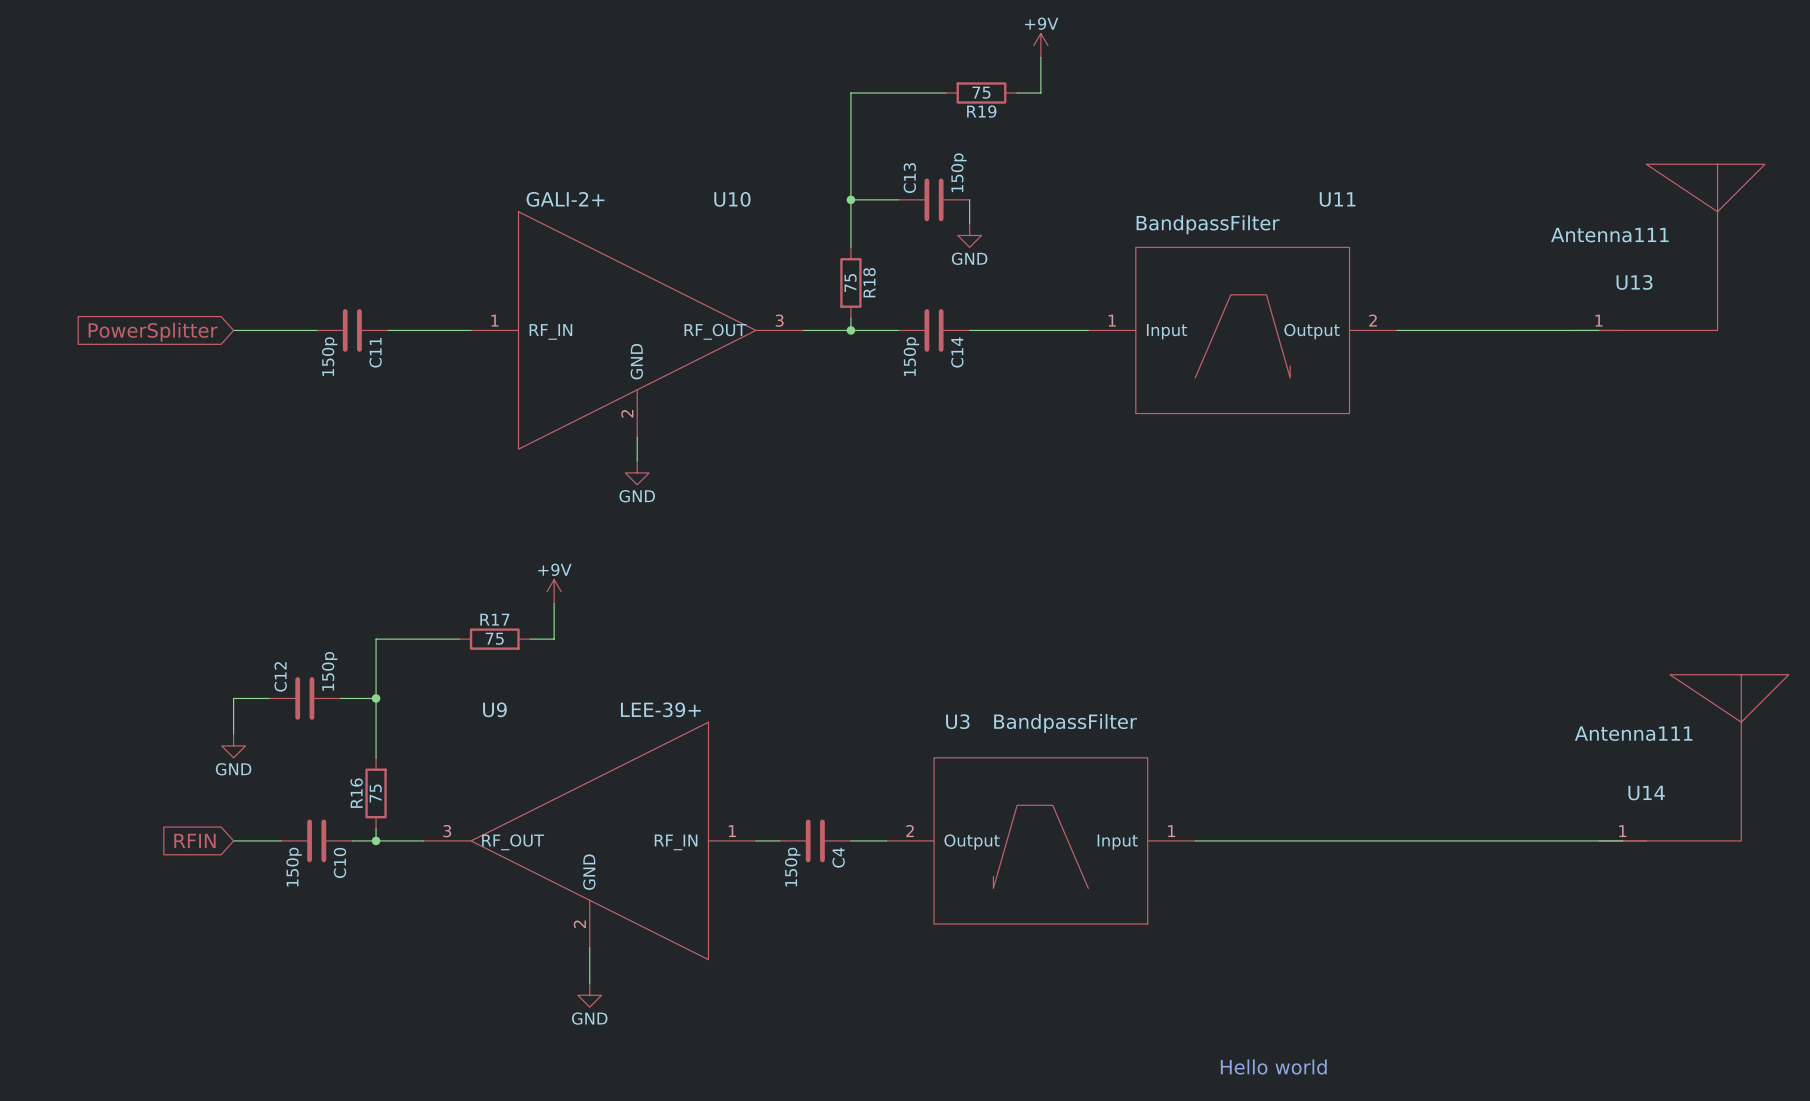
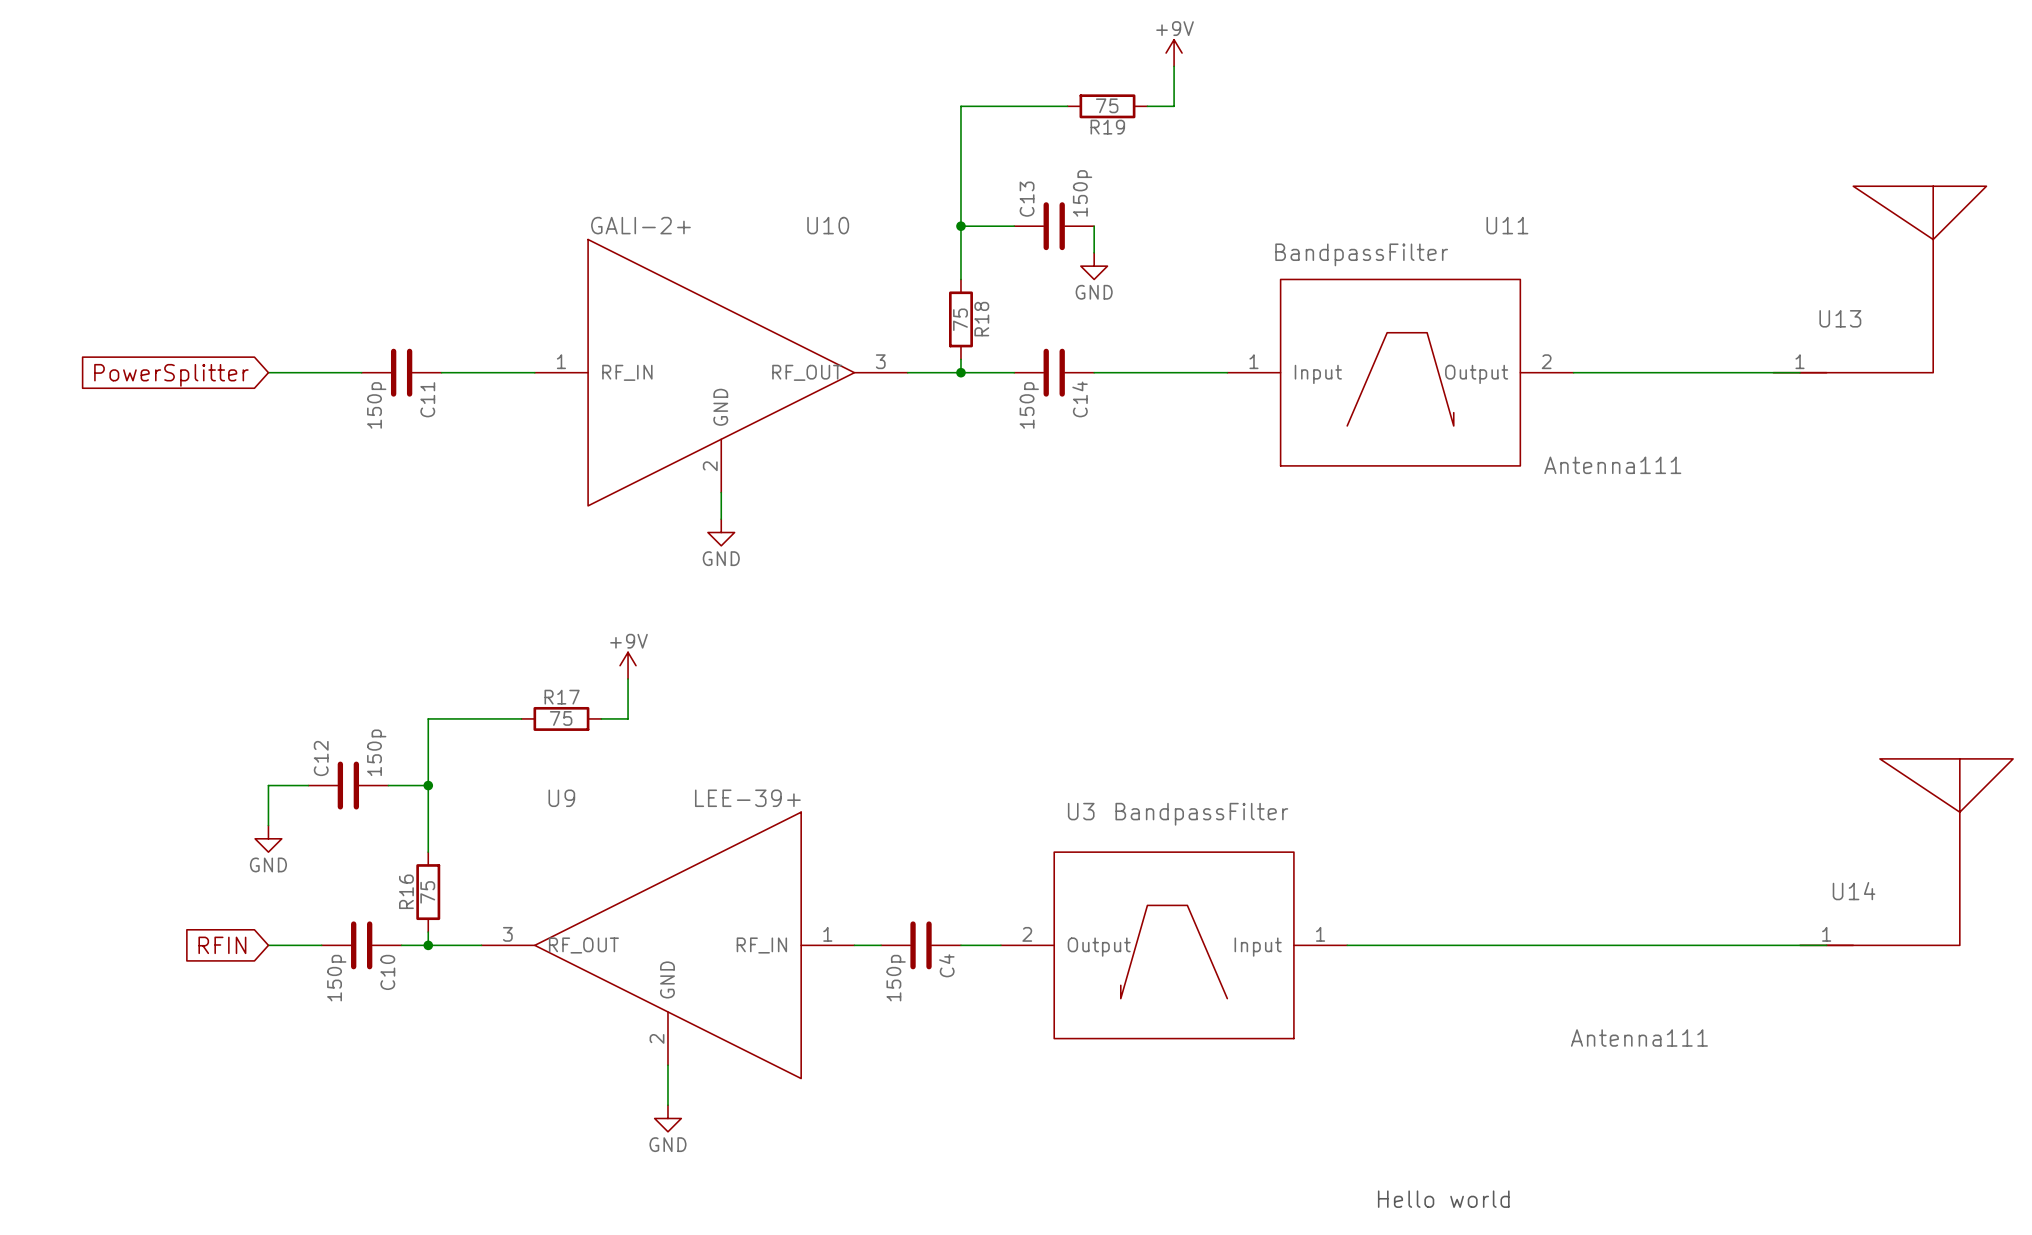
U13 value position: Antenna111 (1609, 235) -> Antenna111 (1612, 465)
U14 value position: Antenna111 (1633, 733) -> Antenna111 (1639, 1037)

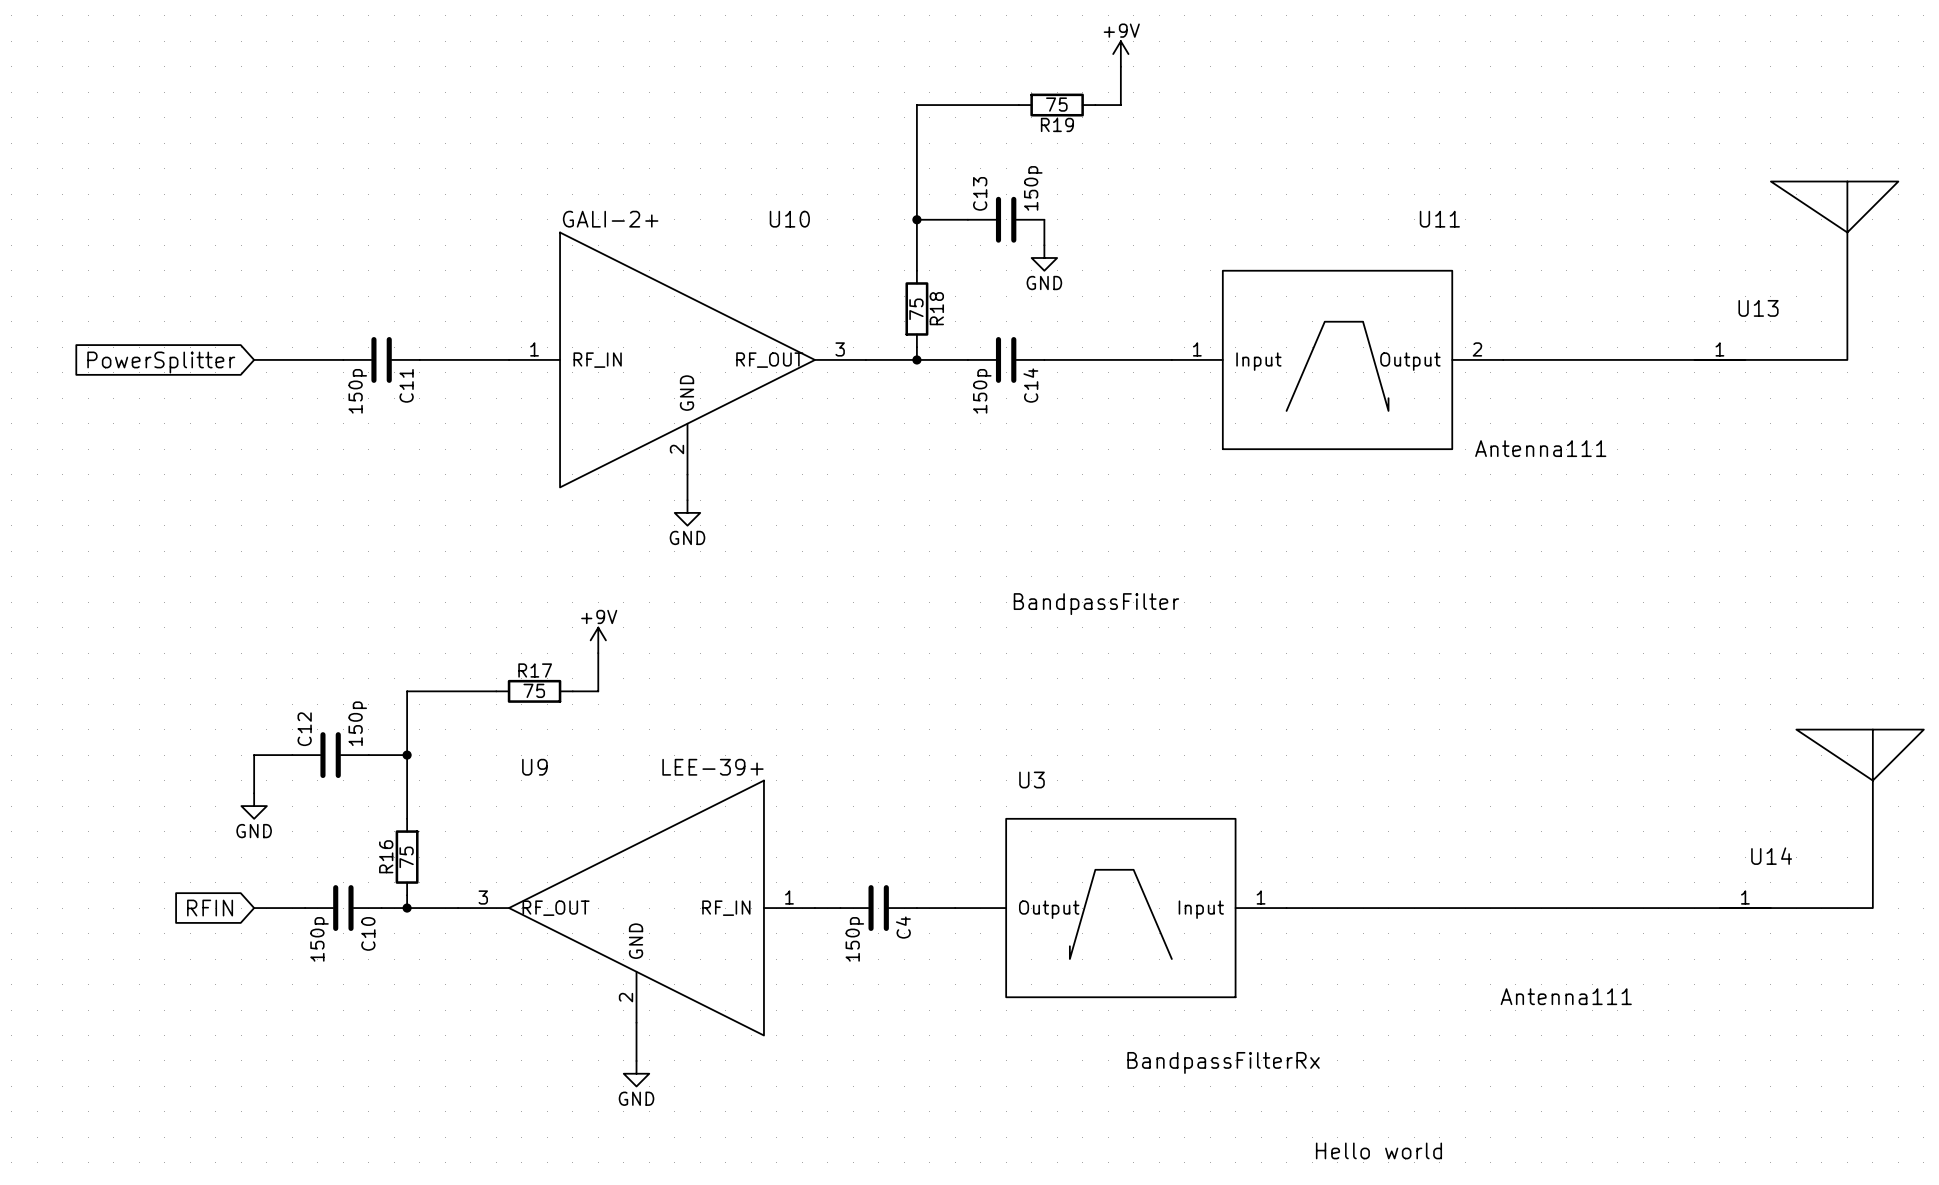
U11 value position: BandpassFilter (1361, 254) -> BandpassFilter (1096, 604)
U3 value: BandpassFilter (1201, 814) -> BandpassFilterRx (1223, 1062)
U3 pin number: 2 (1027, 934) -> none

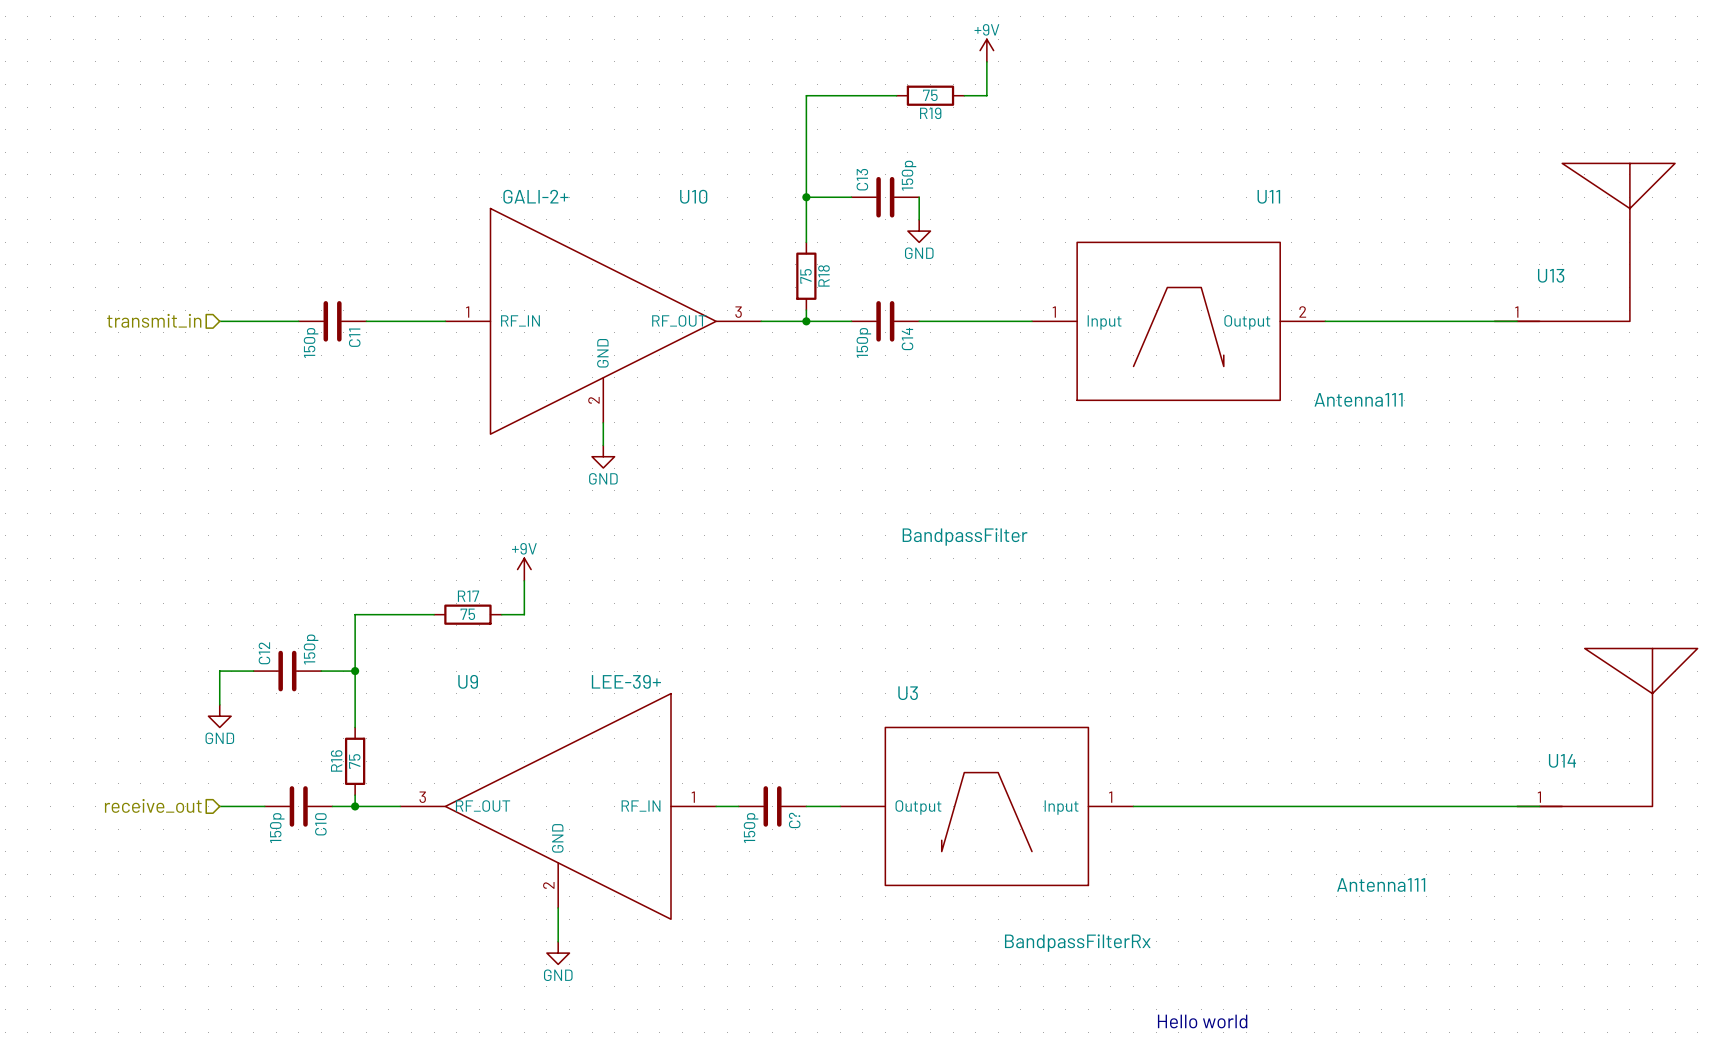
hierarchical label: none -> transmit_in (154, 320)
global label: PowerSplitter (161, 362) -> none
hierarchical label: none -> receive_out (153, 805)
global label: RFIN (210, 908) -> none
C4 name: C4 (903, 927) -> C? (794, 820)

